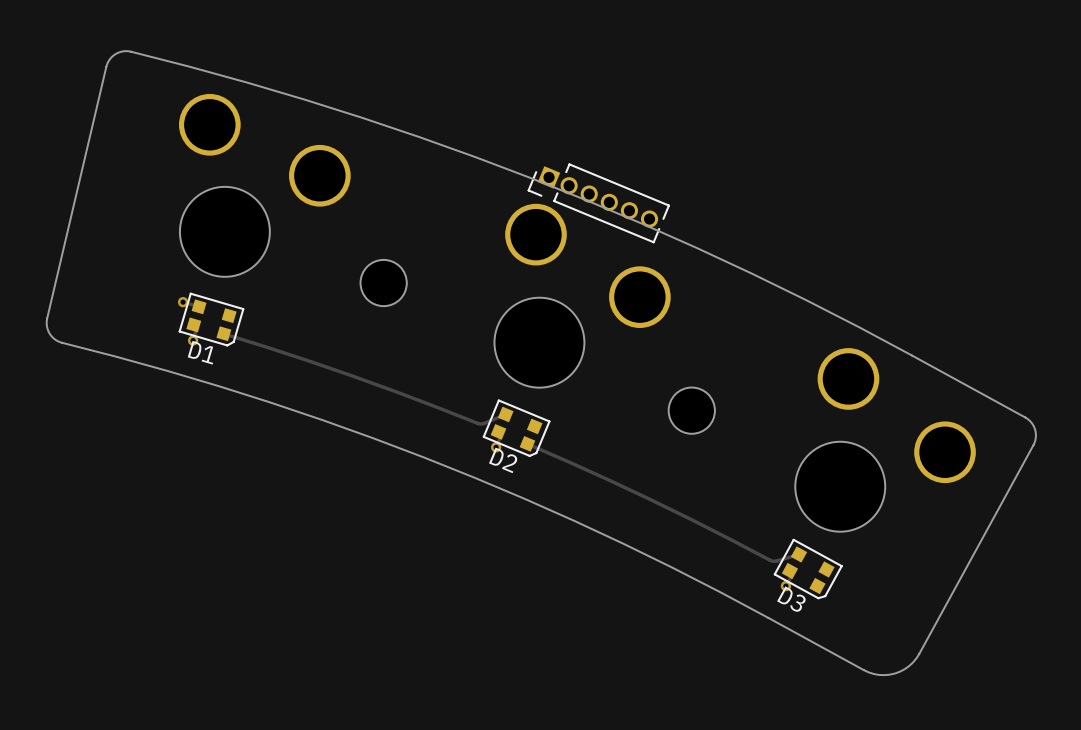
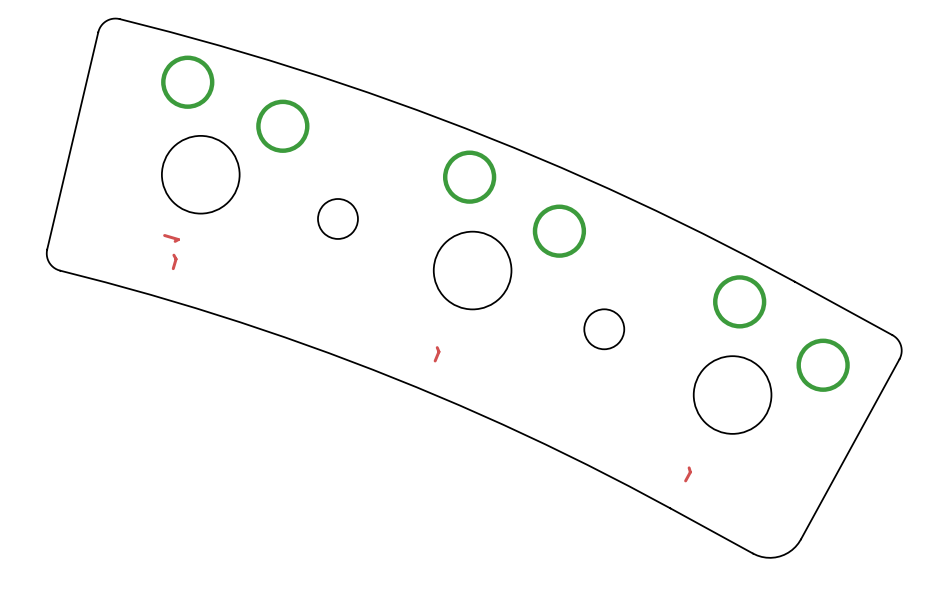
part: (598, 203) -> none
via: (183, 302) -> none
D1: (211, 319) -> none
track: (223, 333) (351, 375) (478, 423) (505, 414) -> none
via: (193, 340) -> none
D2: (516, 428) -> none
track: (527, 444) (650, 499) (771, 560) (799, 554) -> none
via: (496, 447) -> none
D3: (808, 569) -> none
via: (785, 586) -> none

